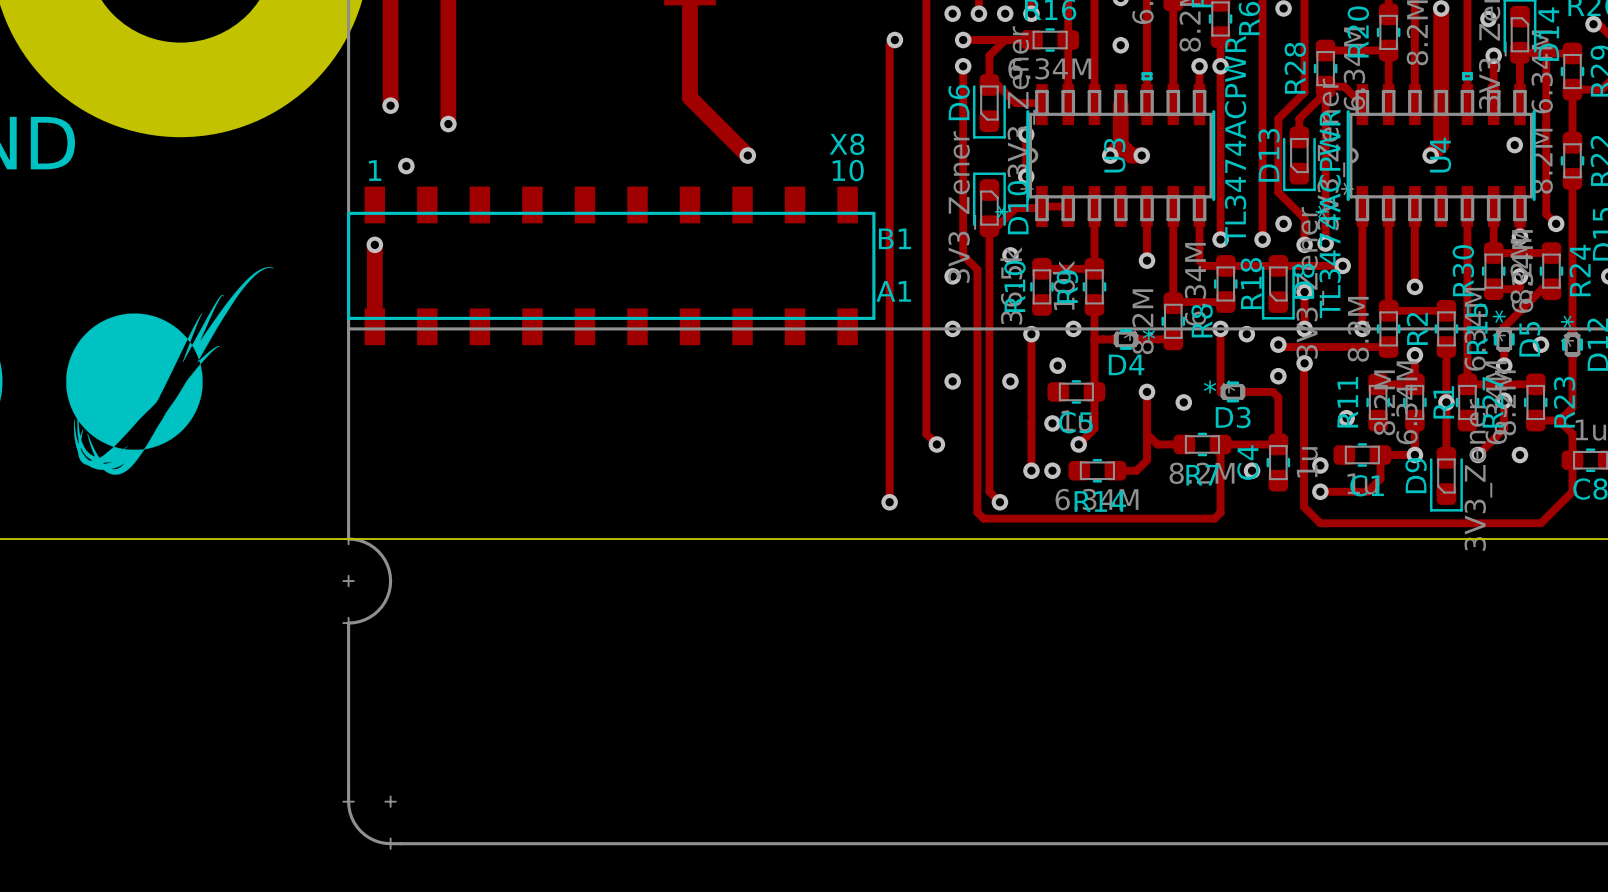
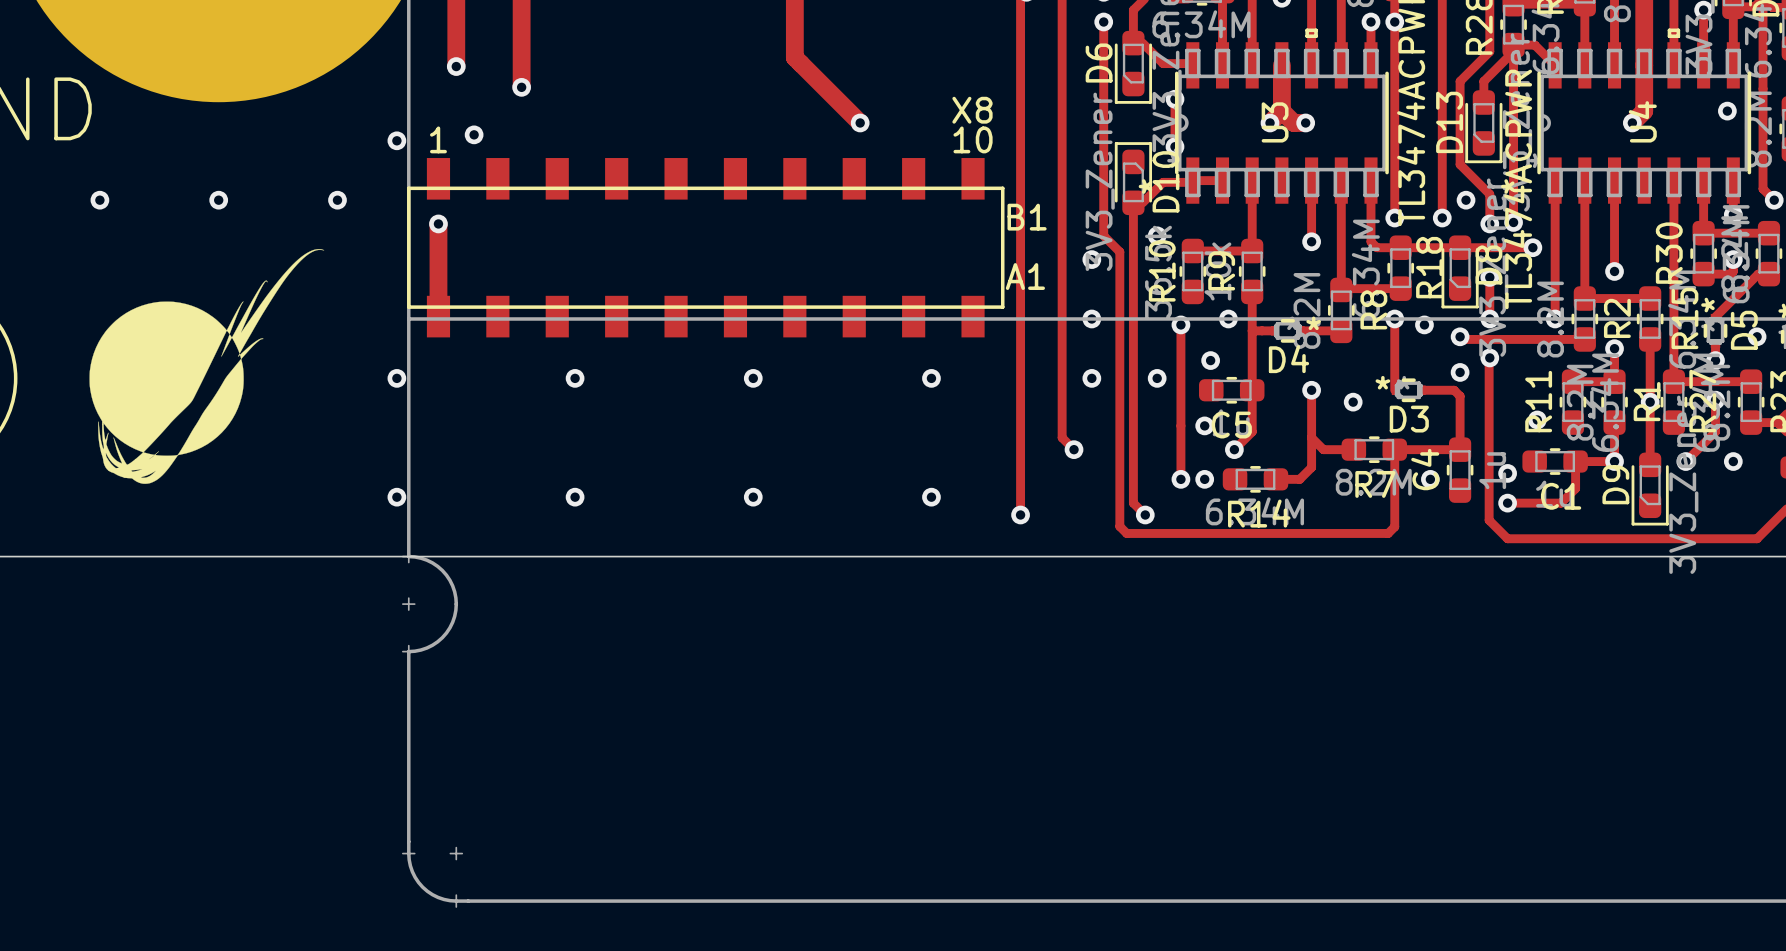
via: none -> (396, 140)
via: none -> (99, 200)
via: none -> (218, 200)
via: none -> (337, 200)
via: none -> (396, 378)
via: none -> (575, 378)
via: none -> (753, 378)
via: none -> (931, 378)
via: none -> (396, 497)
via: none -> (575, 497)
via: none -> (753, 497)
via: none -> (931, 497)

